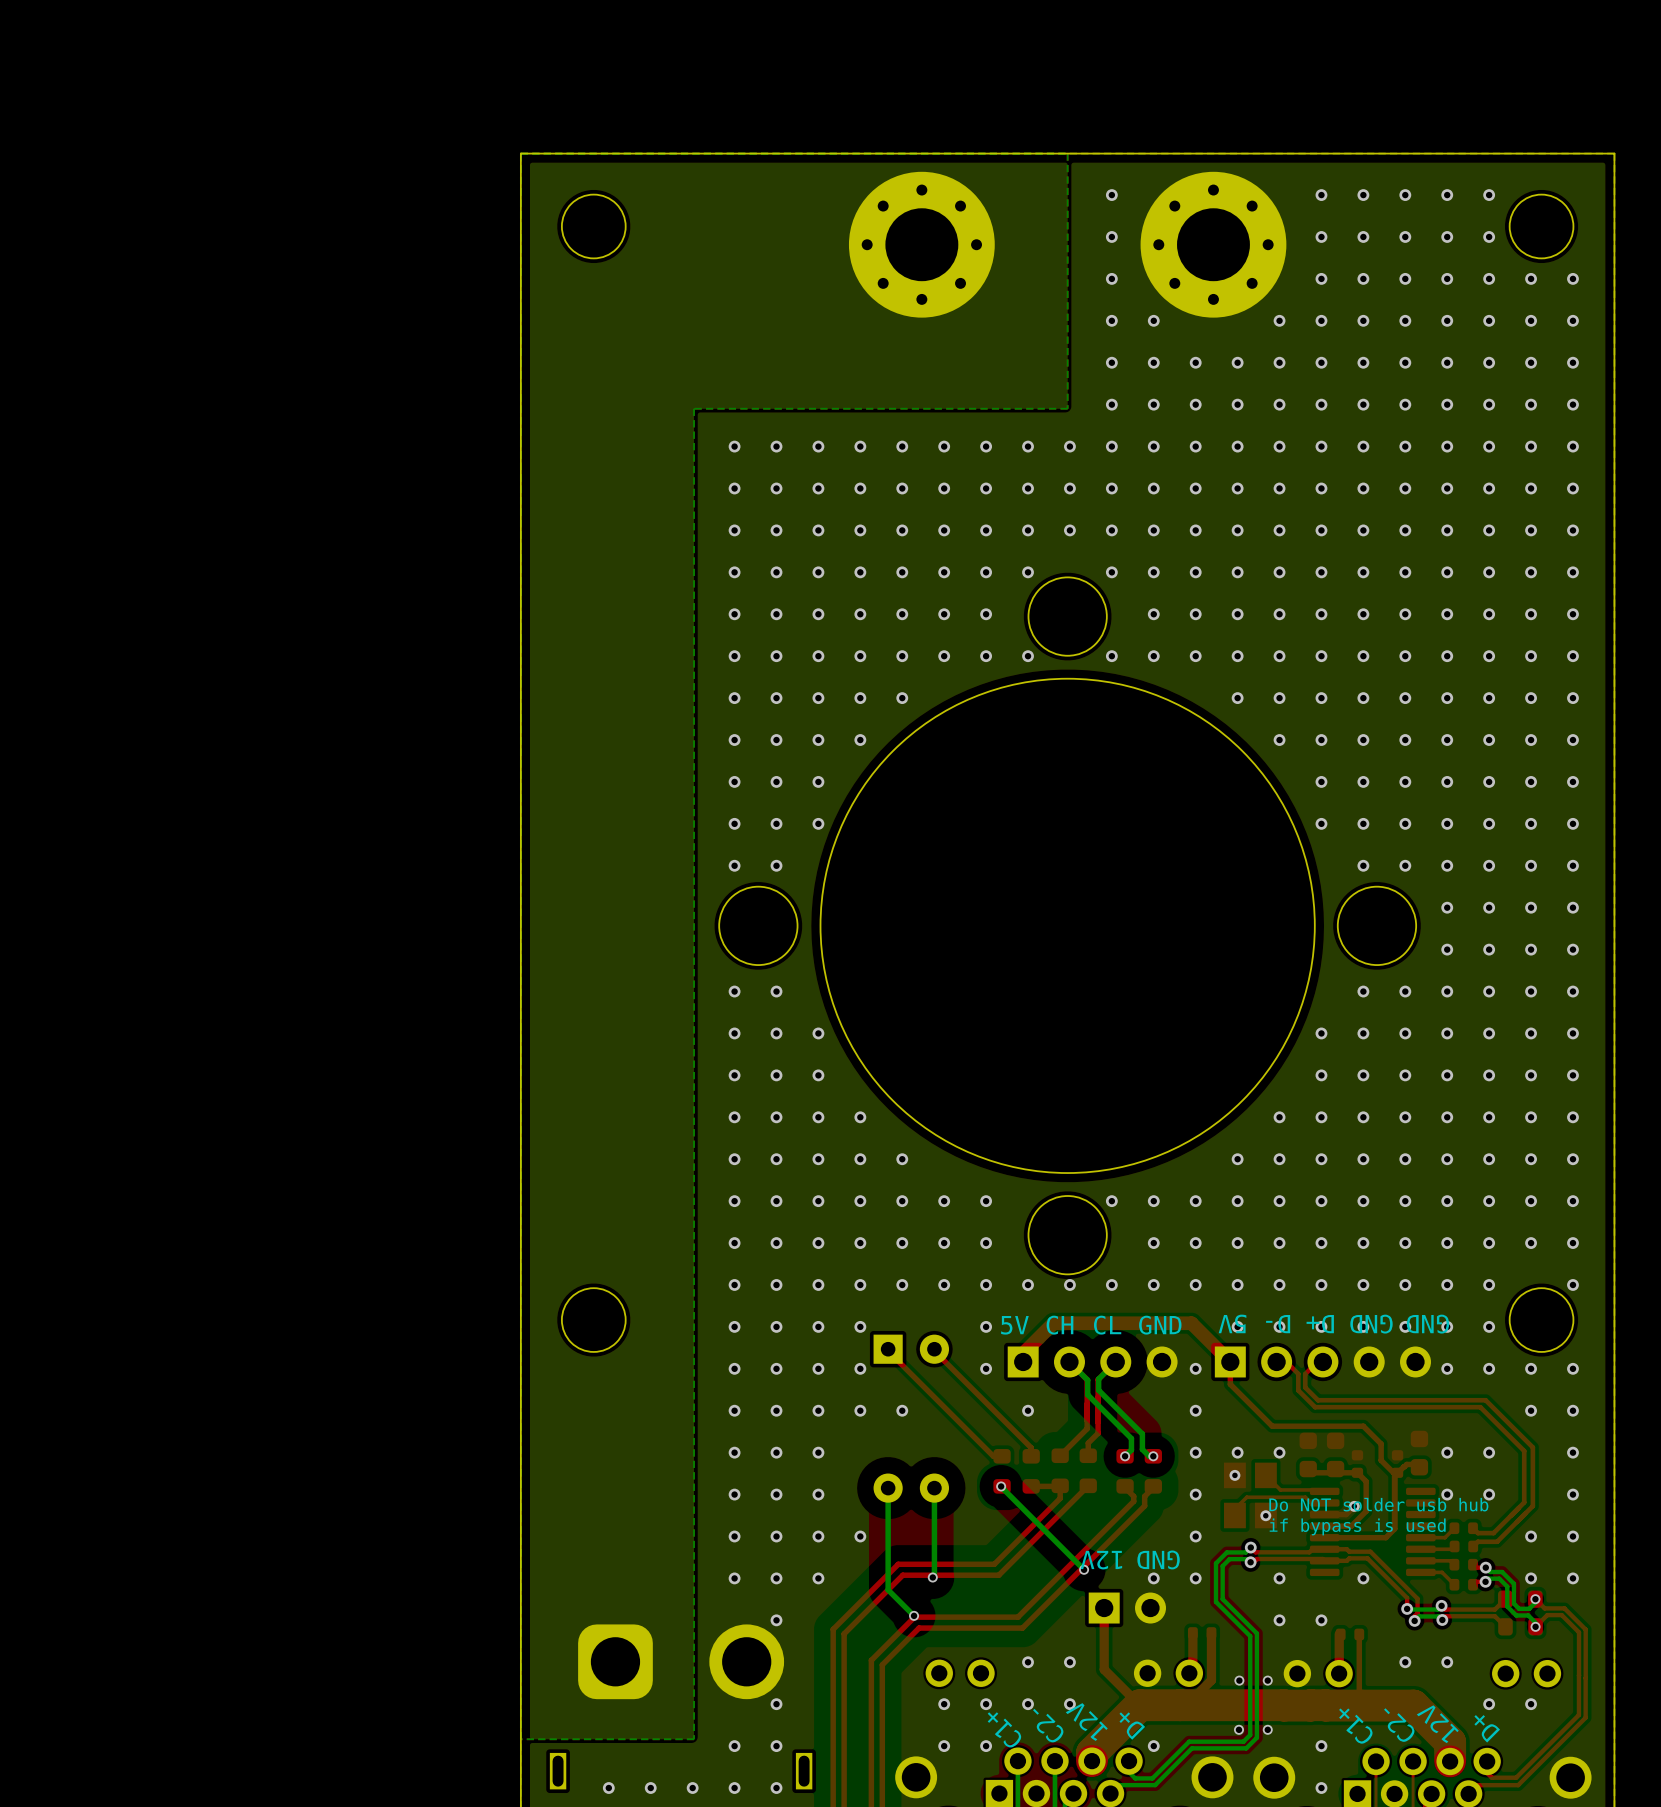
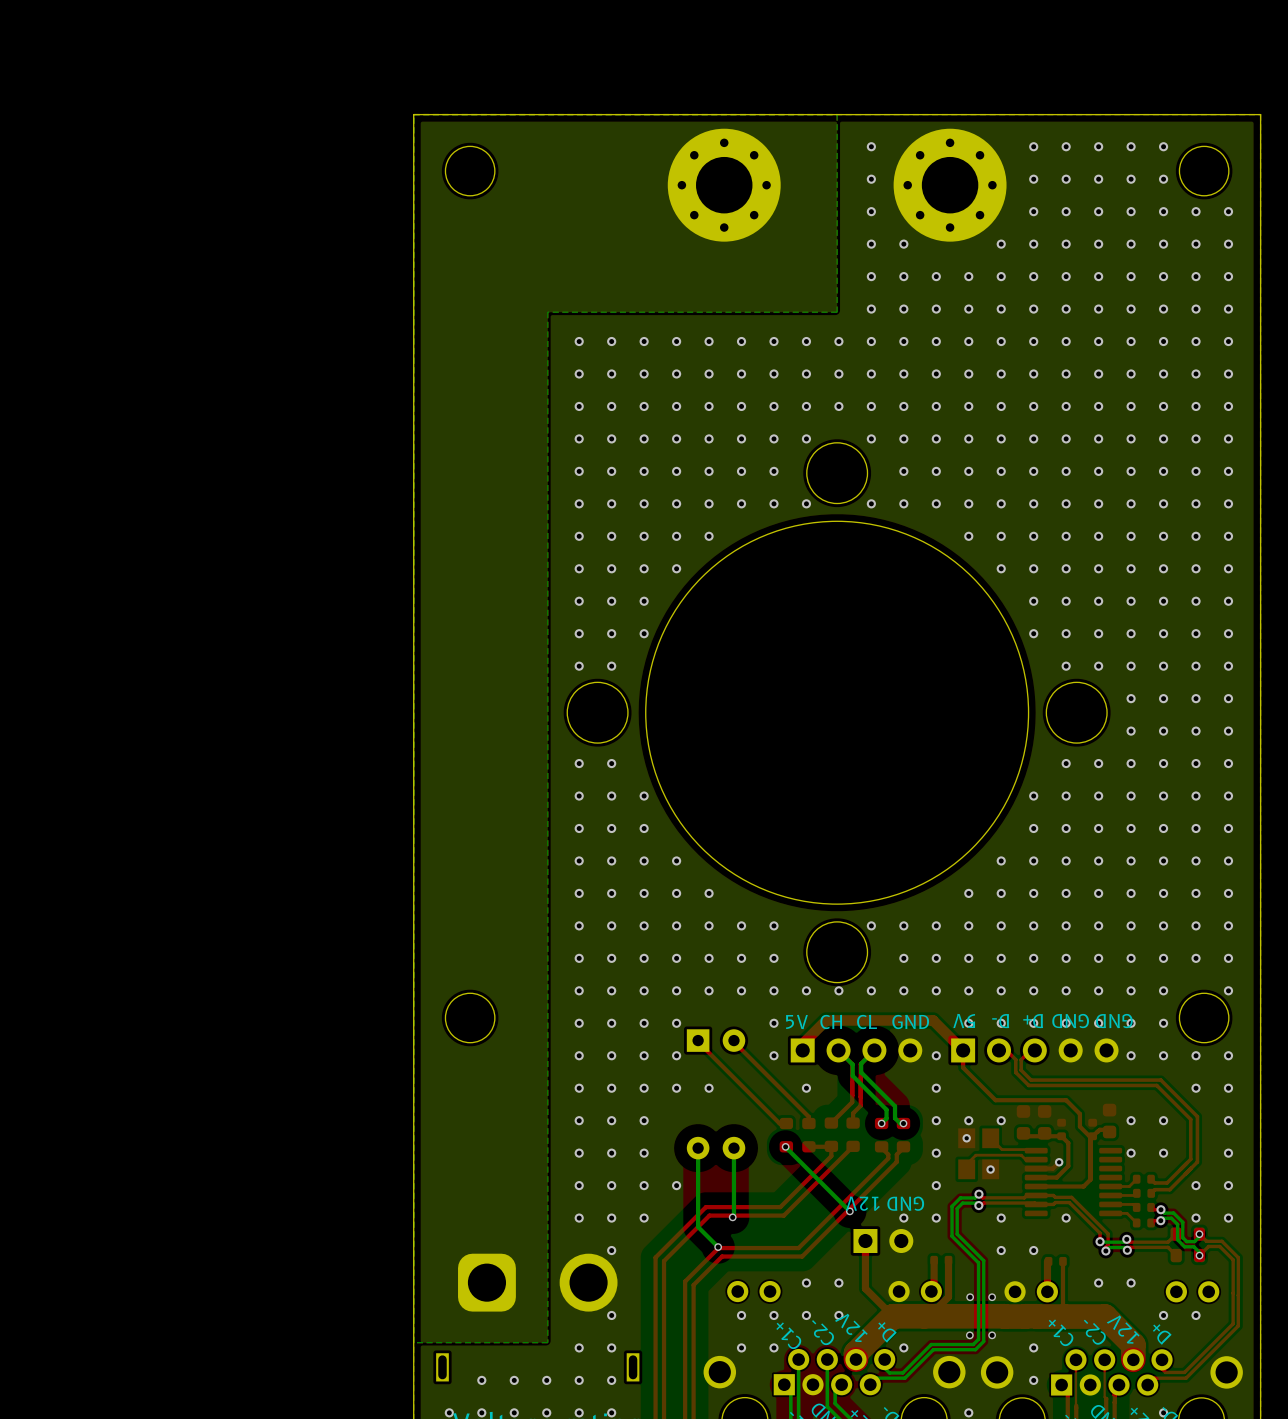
text: Do NOT solder usb hub (1378, 1504) -> none
text: if bypass is used (1357, 1526) -> none

